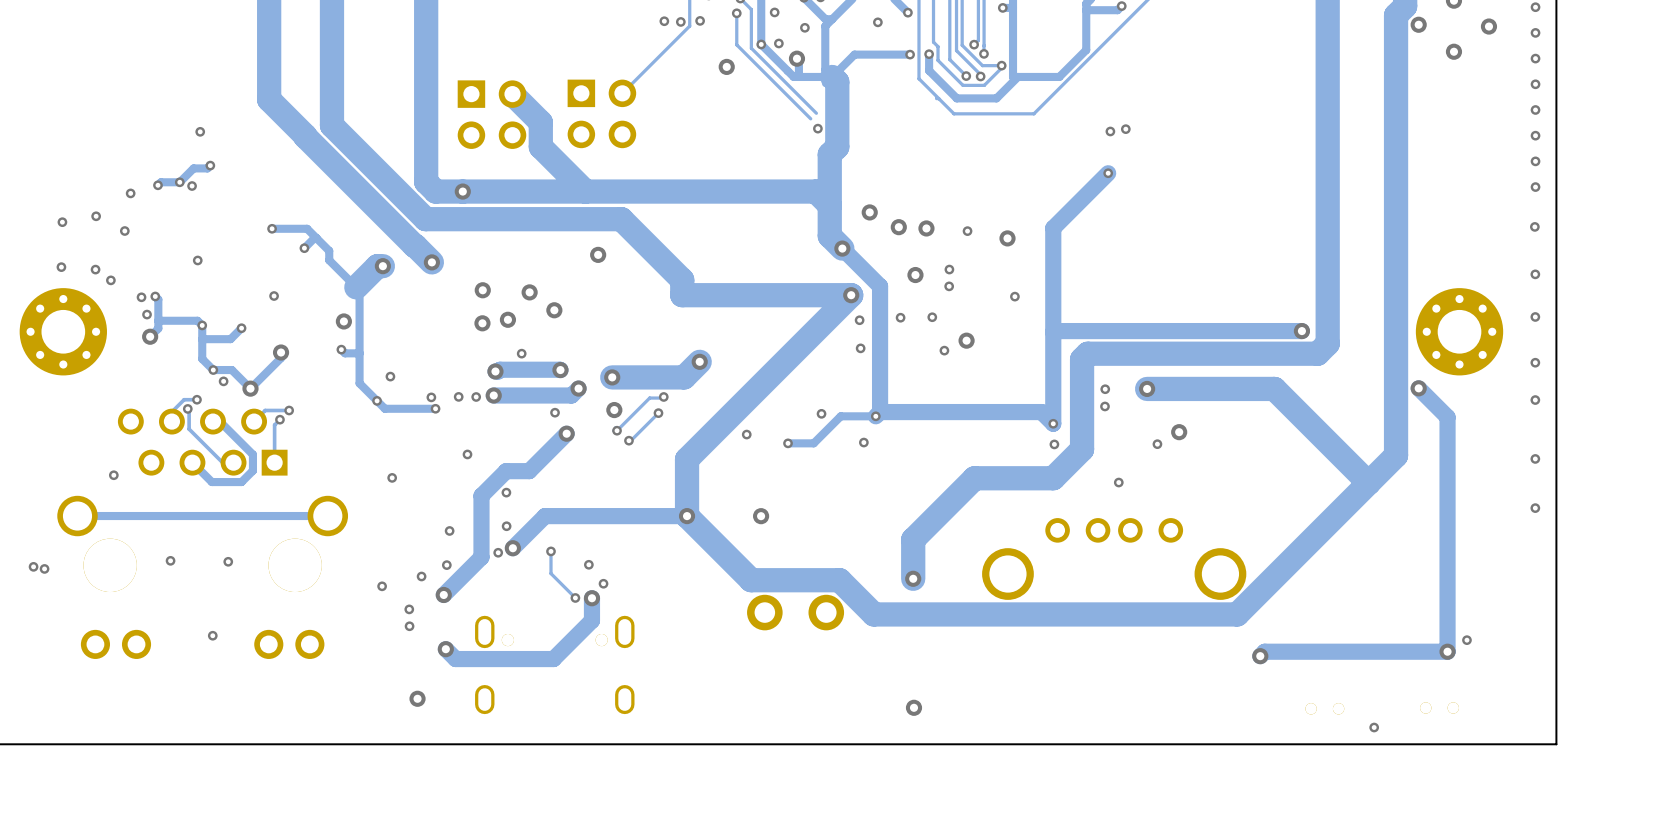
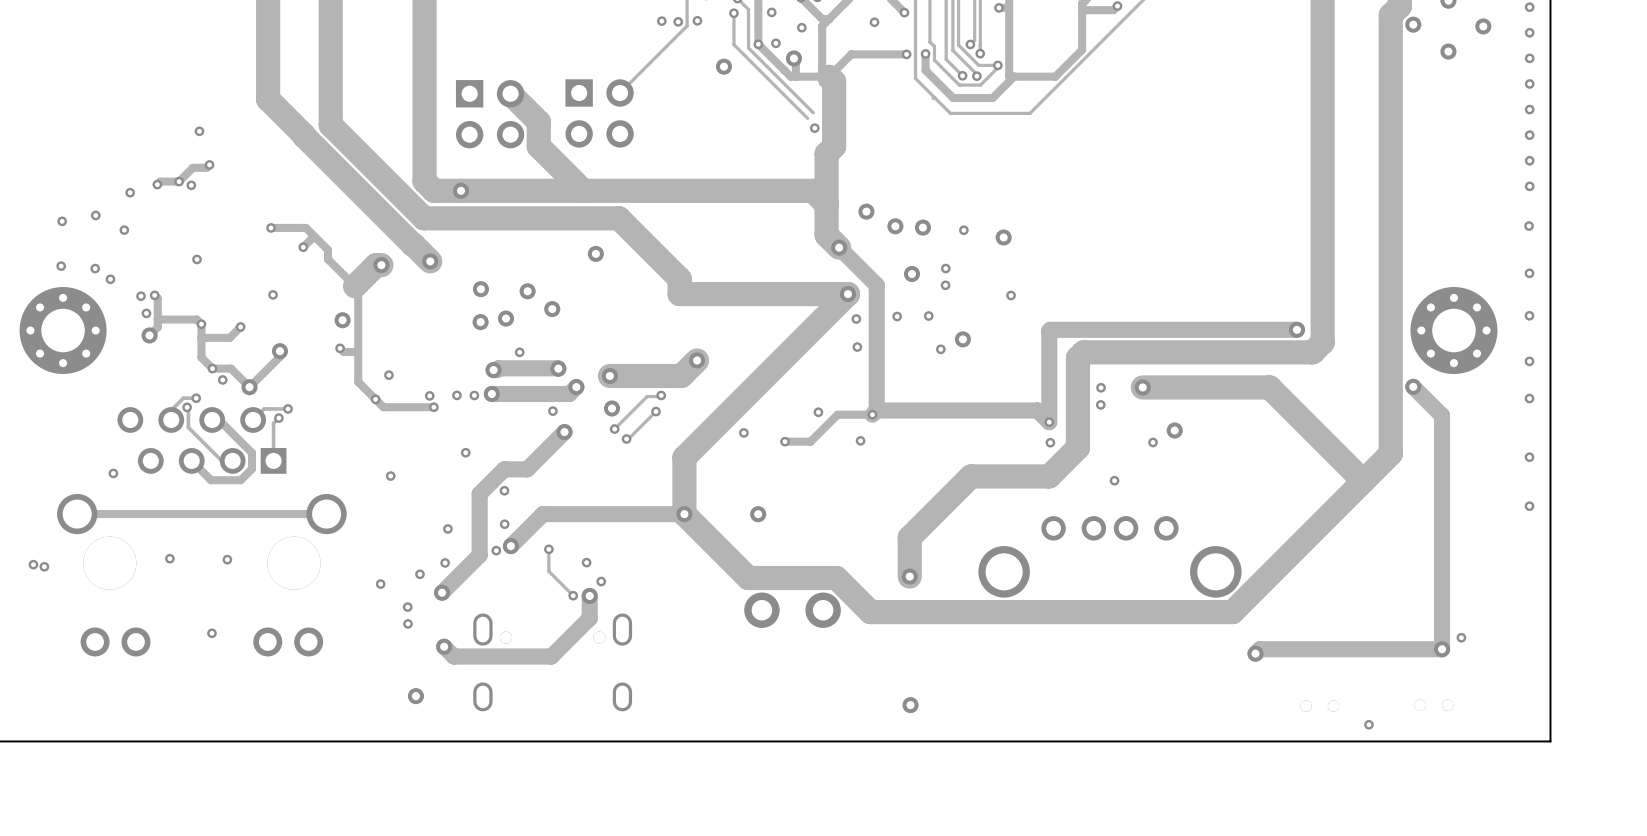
via: (1125, 129) -> none
via: (1110, 131) -> none
track: (1108, 173) (1053, 228) (1053, 332) -> none
via: (1108, 173) -> none

